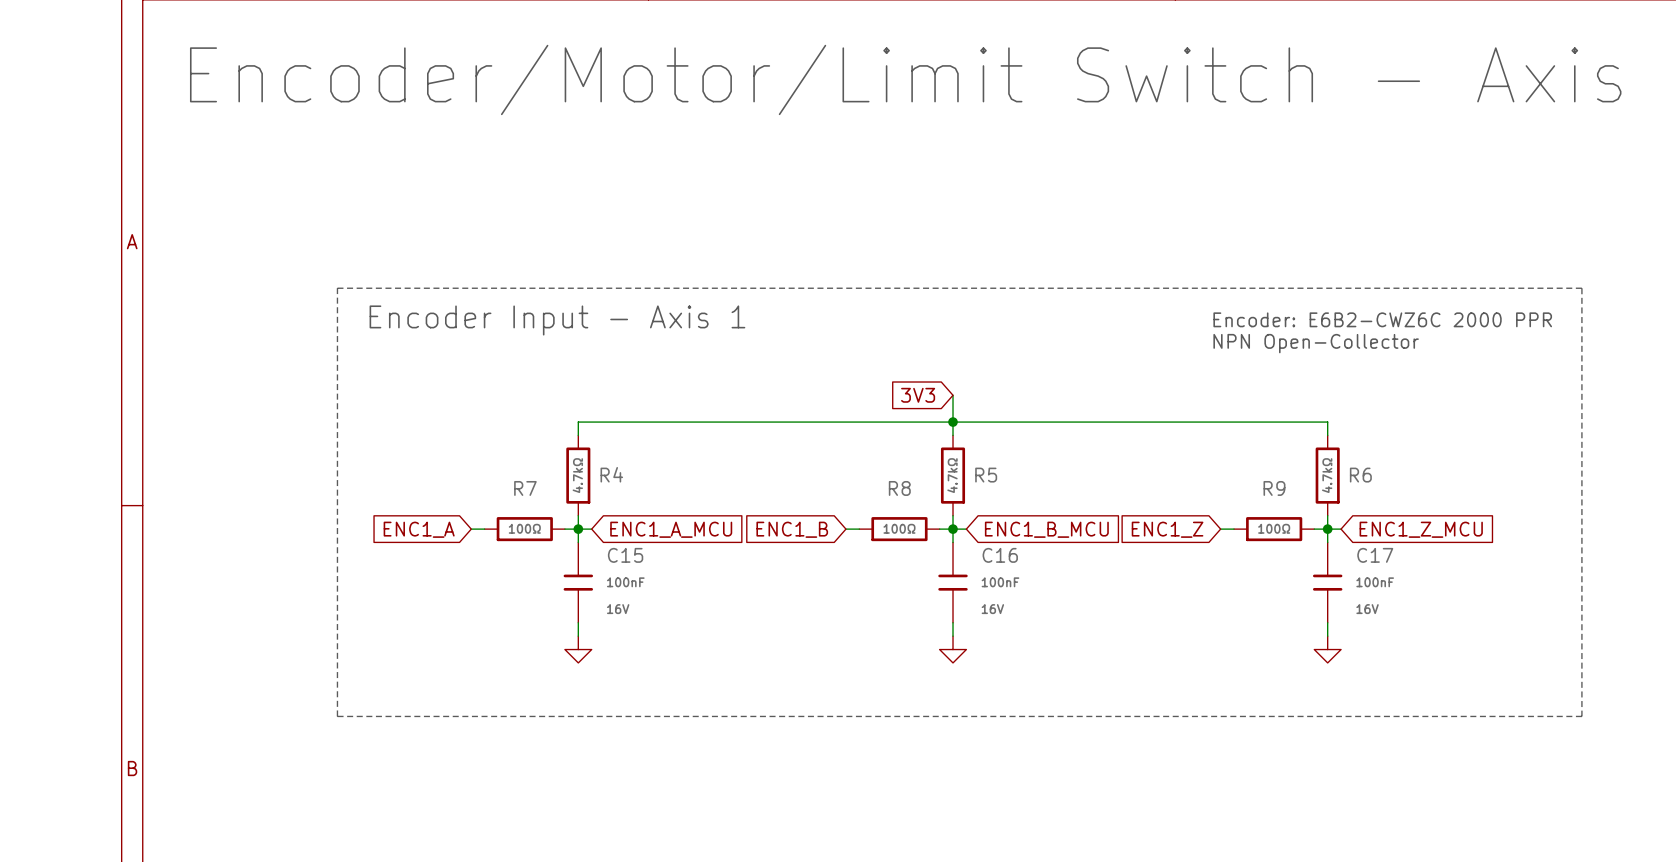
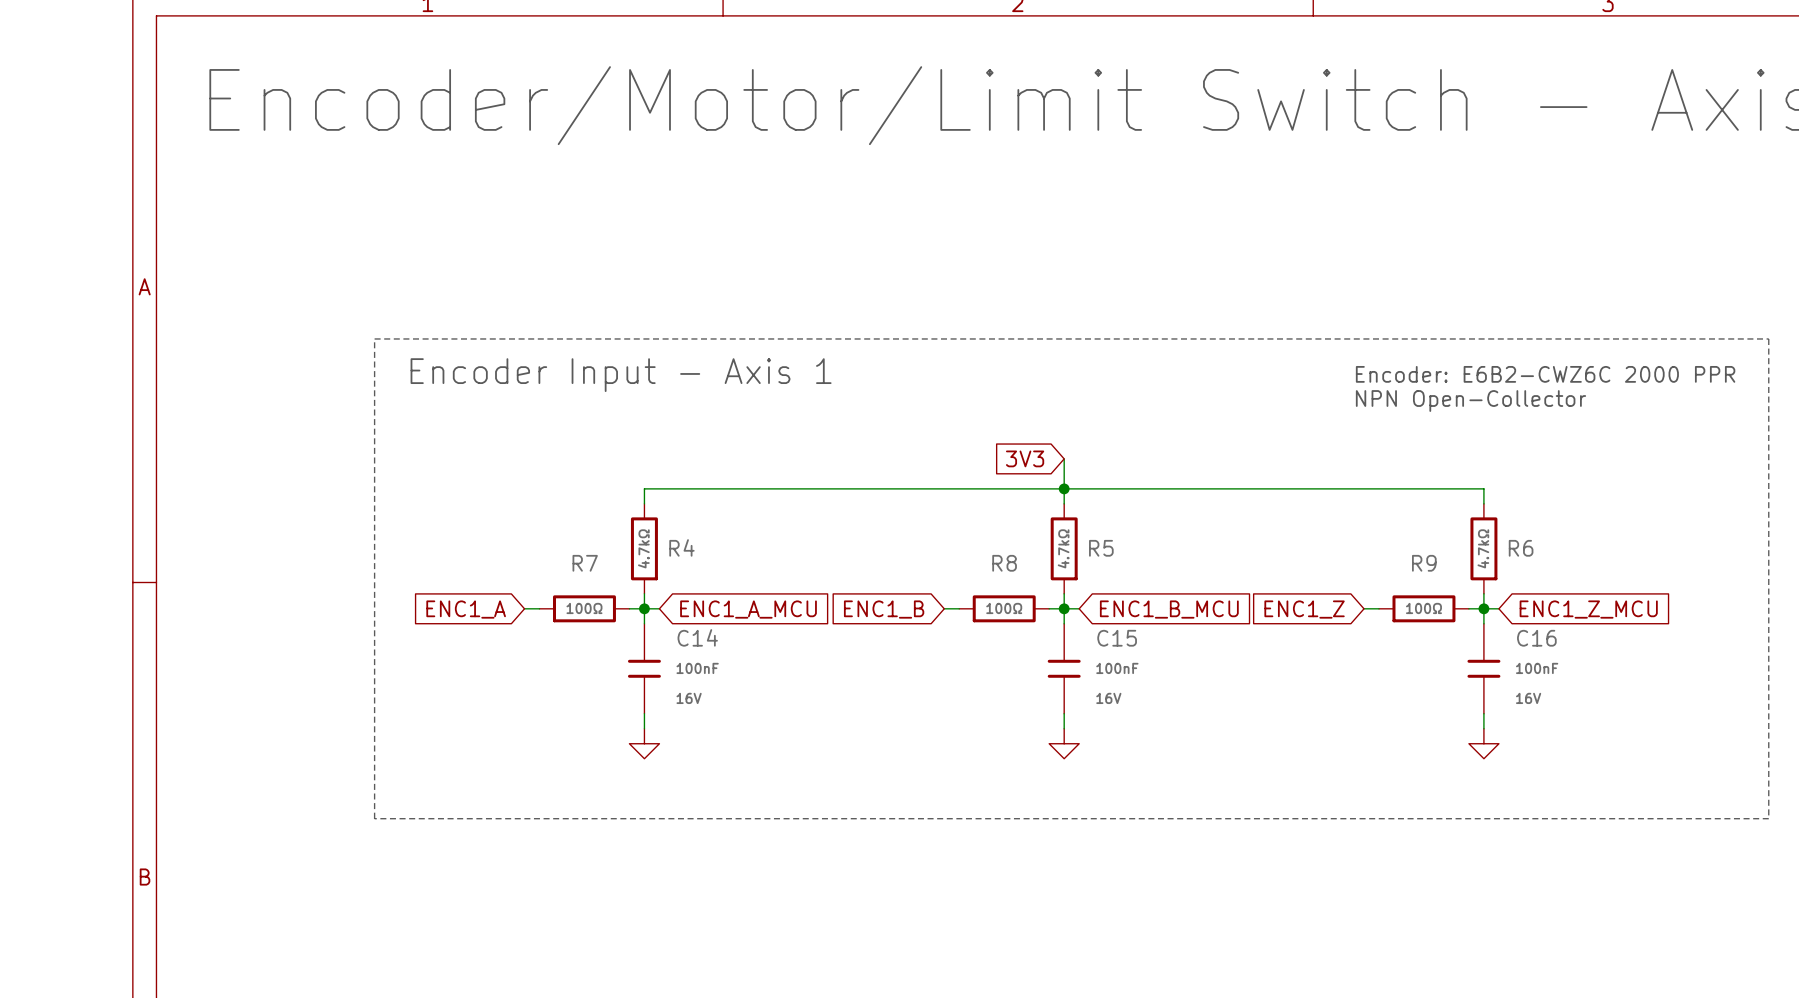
C15 name: C15 (625, 555) -> C14 (697, 637)
C16 name: C16 (1000, 555) -> C15 (1117, 638)
C17 name: C17 (1375, 555) -> C16 (1536, 638)

